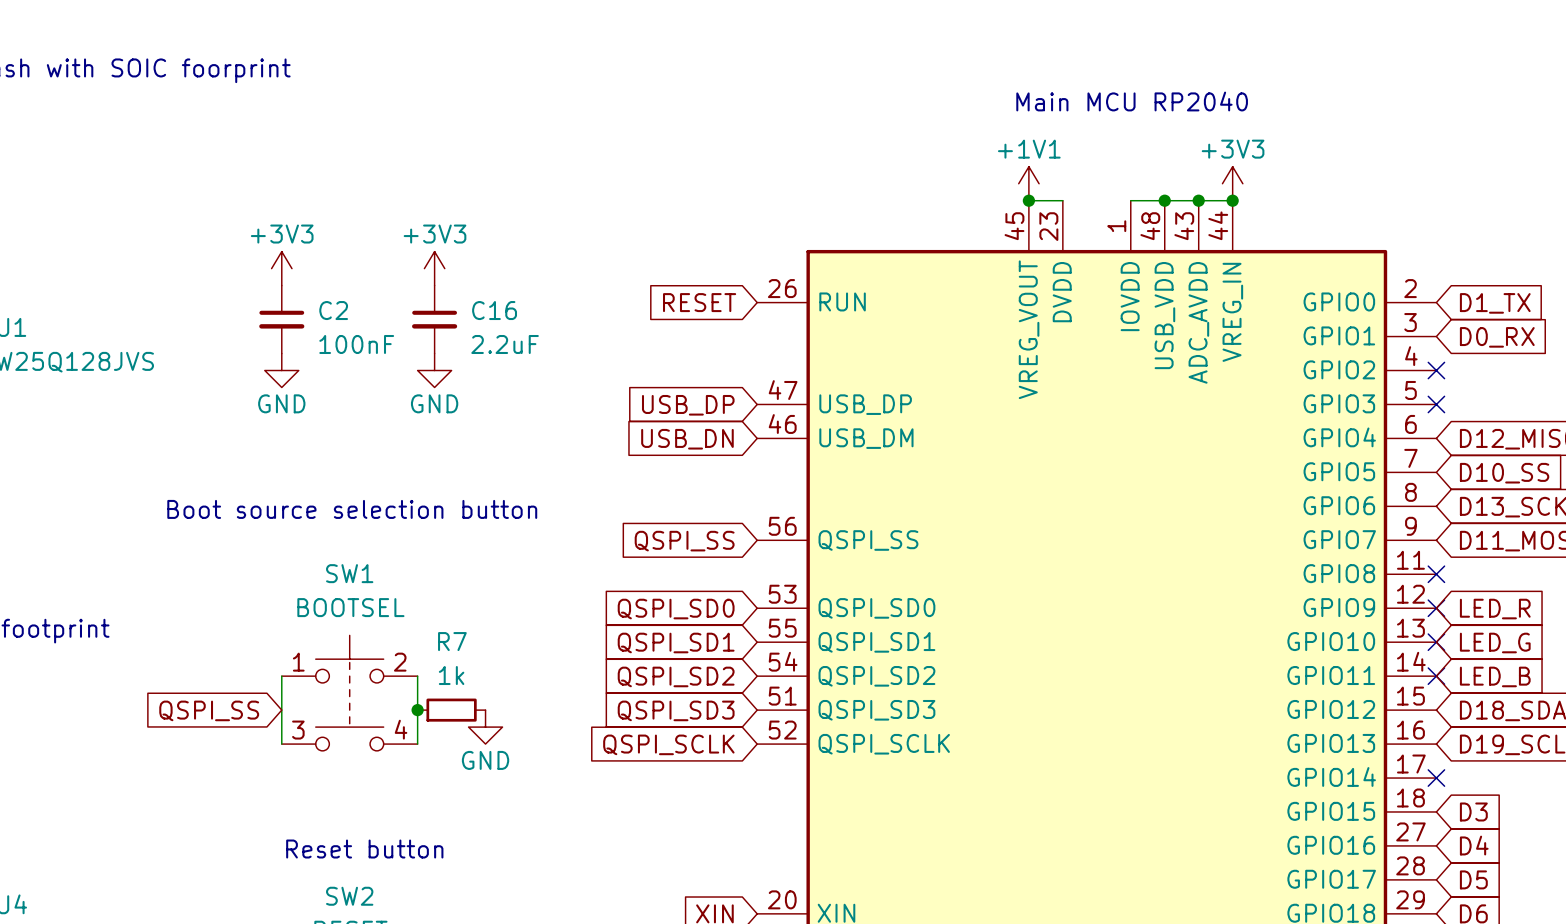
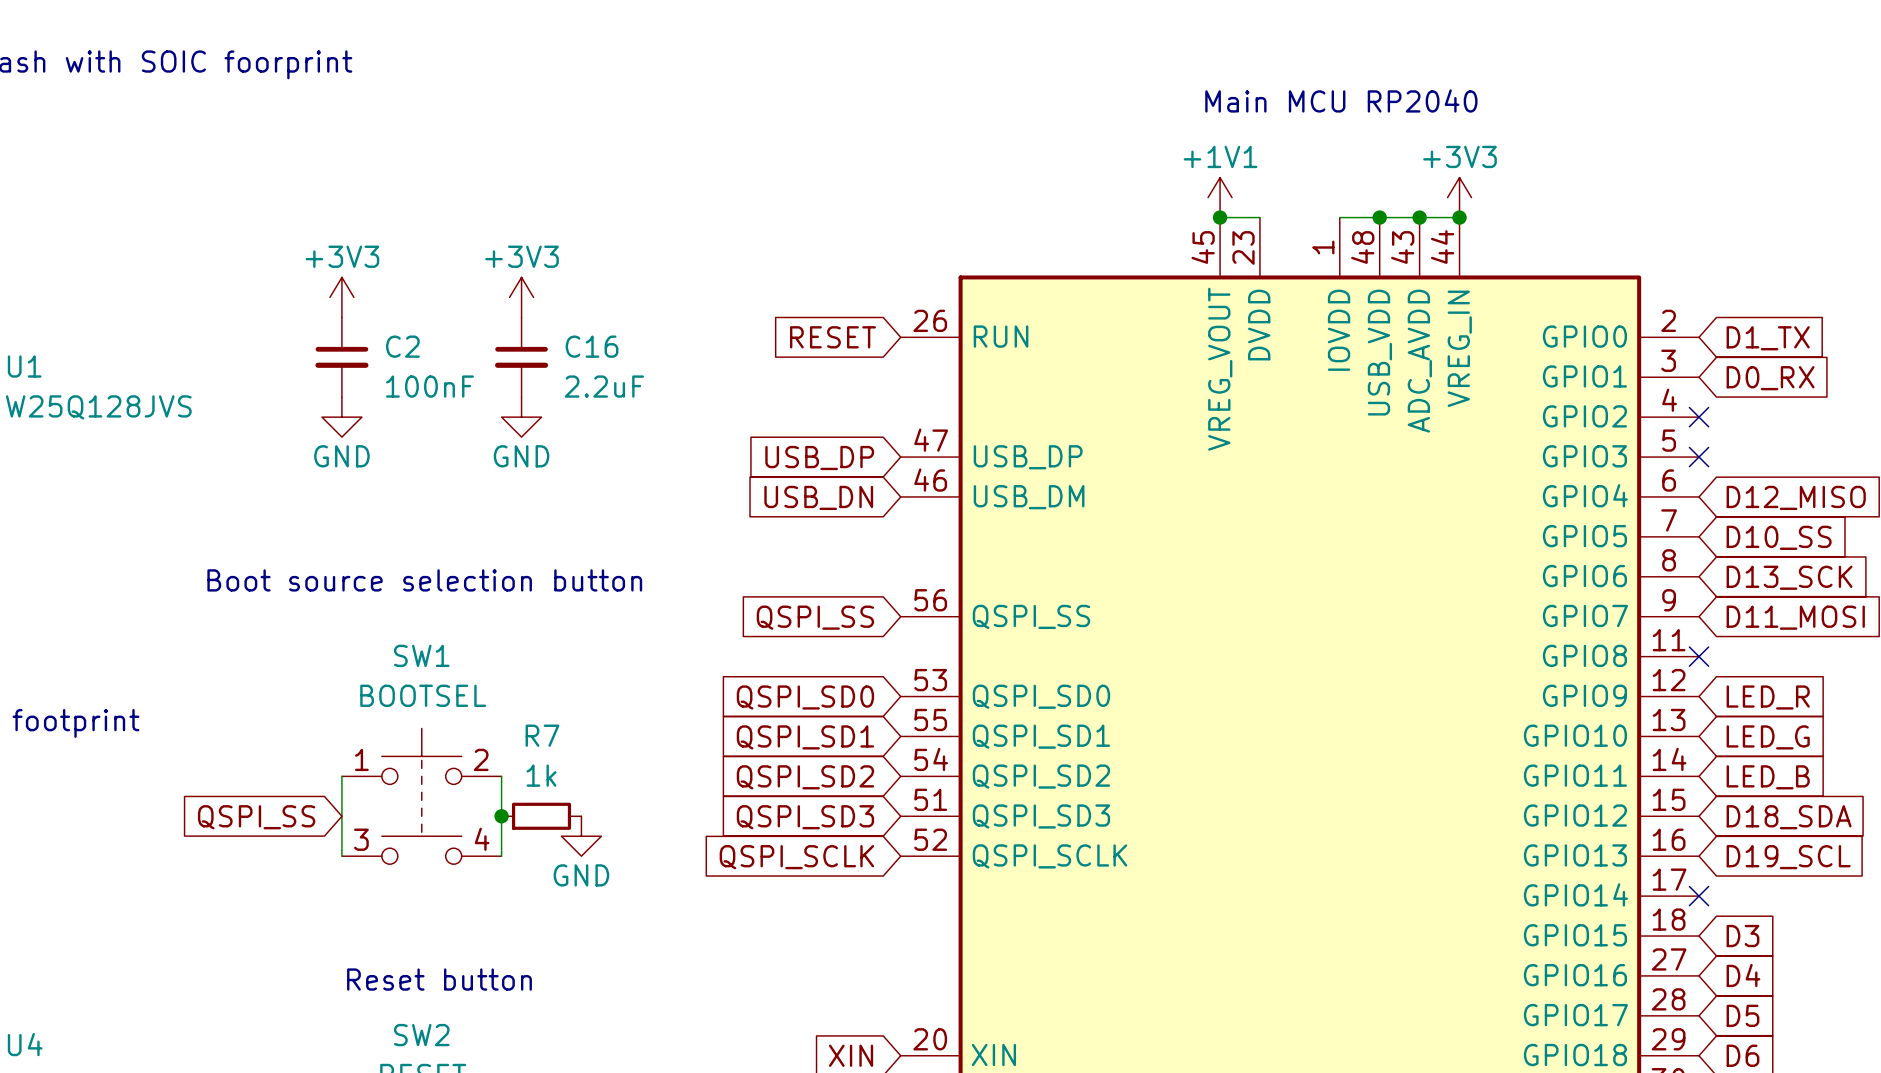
no-connect mark: (1436, 608) -> none
no-connect mark: (1436, 642) -> none
no-connect mark: (1436, 676) -> none

